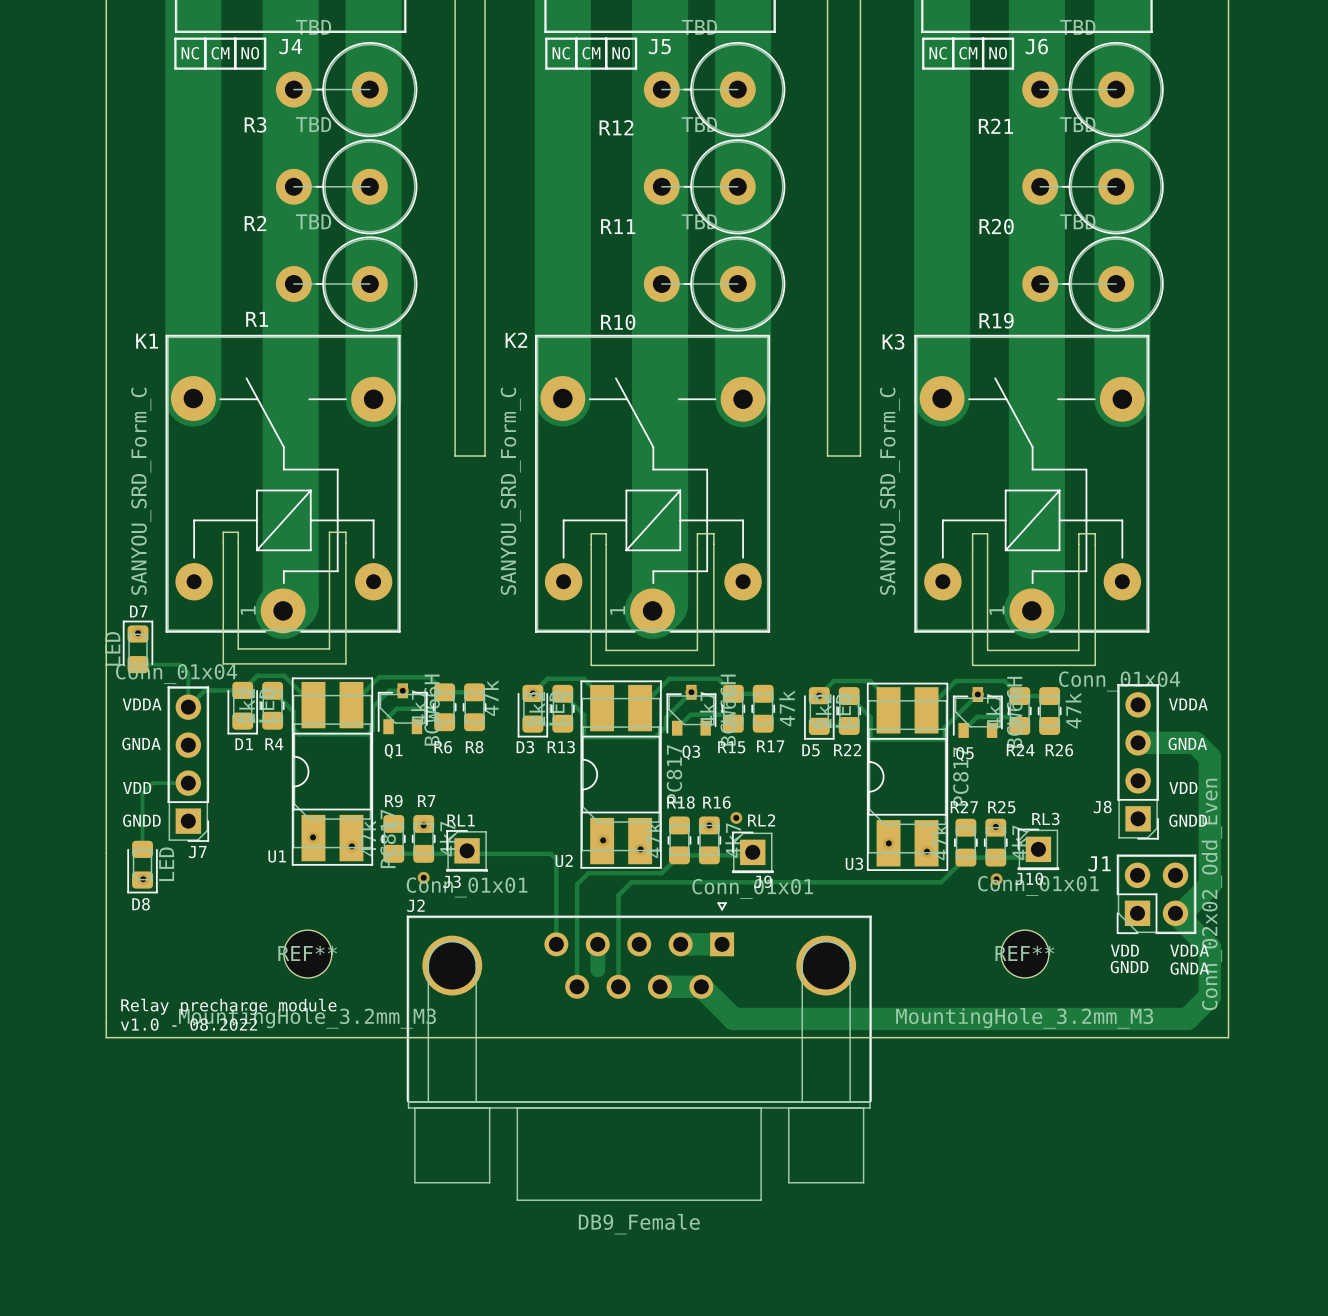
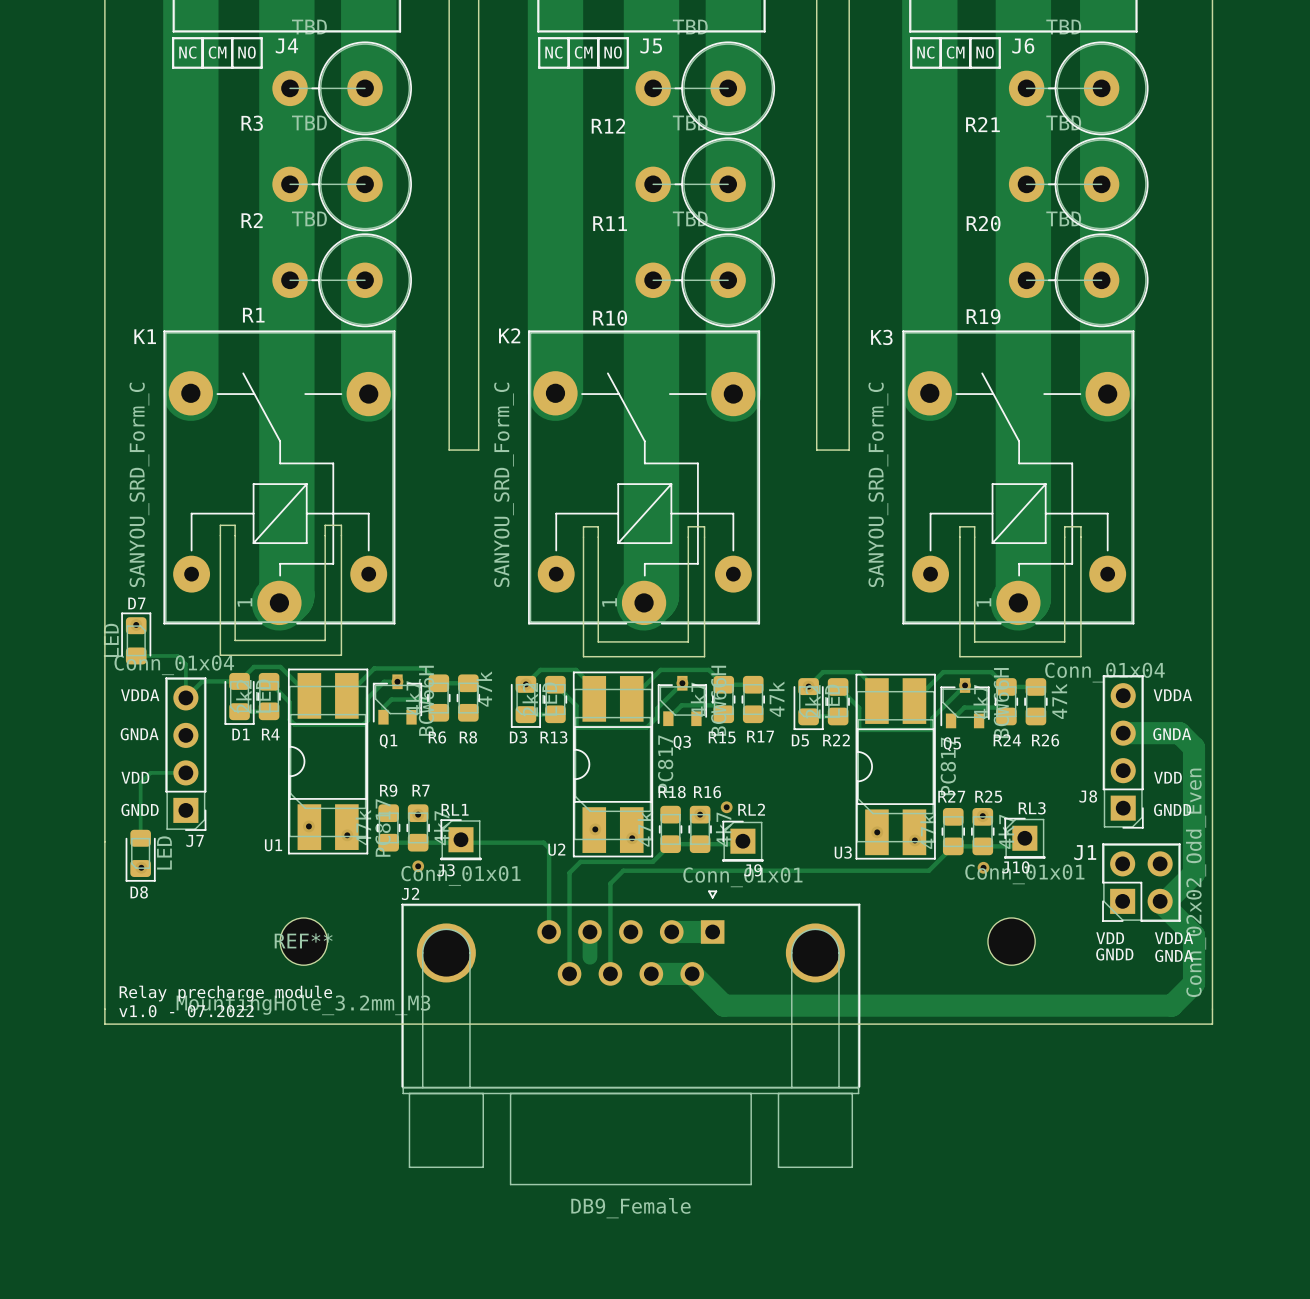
REF** name: REF** (1024, 953) -> none
REF** value: MountingHole_3.2mm_M3 (1024, 1018) -> none
text: v1.0 - 08.2022 (188, 1024) -> v1.0 - 07.2022 (186, 1011)

